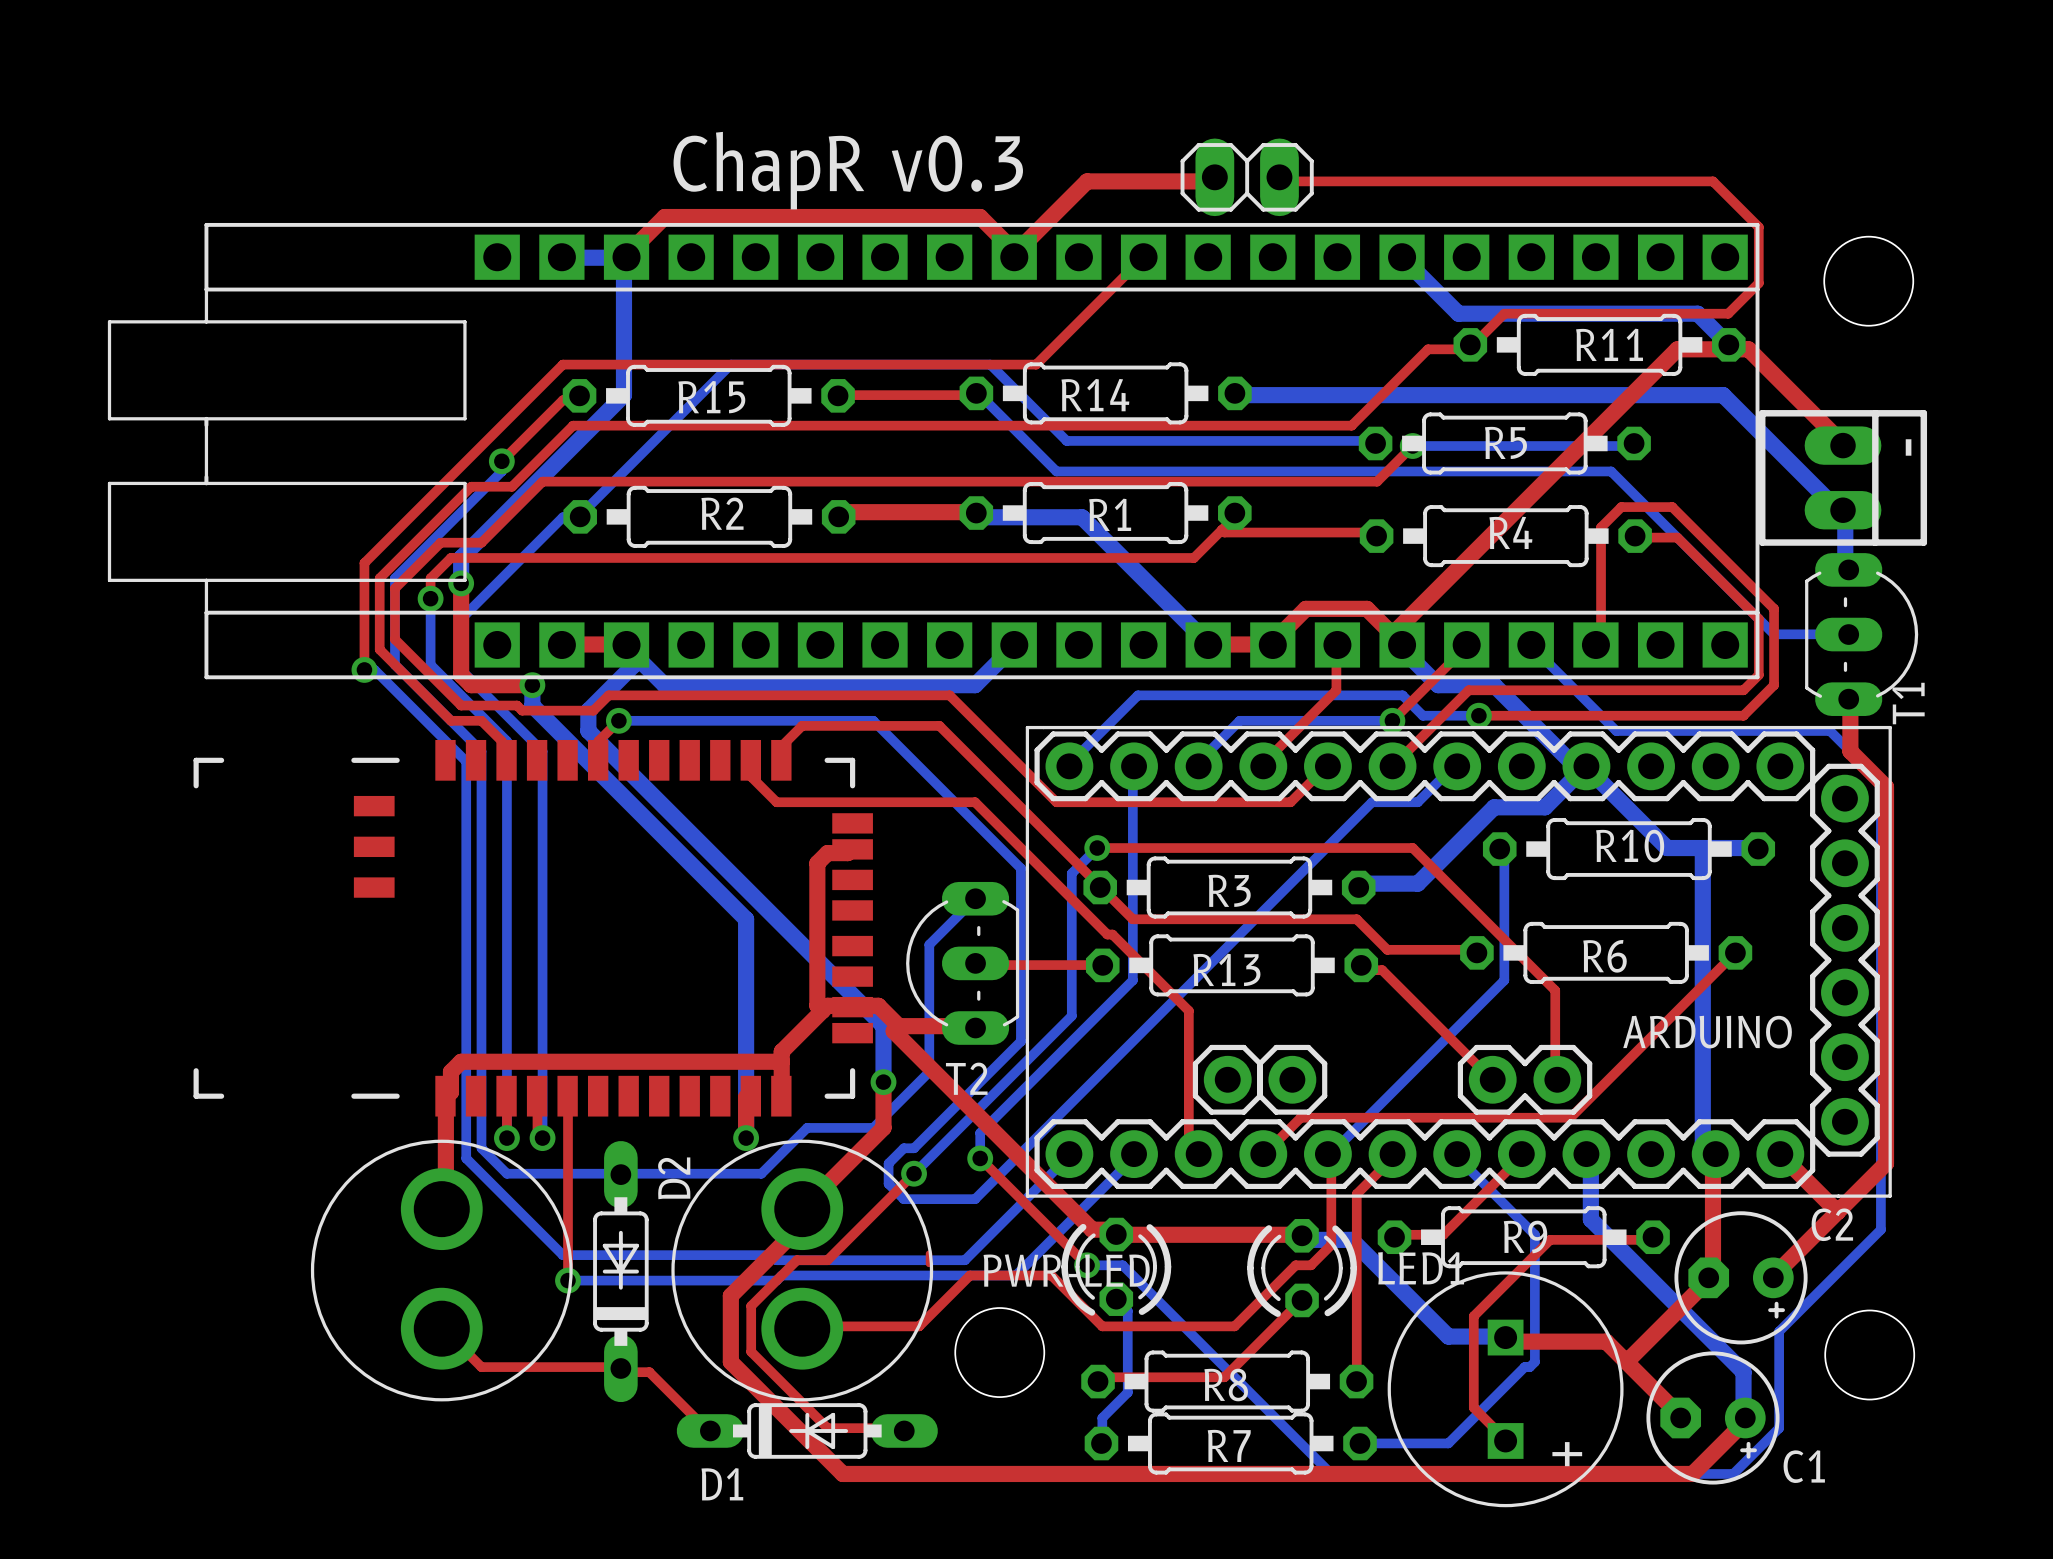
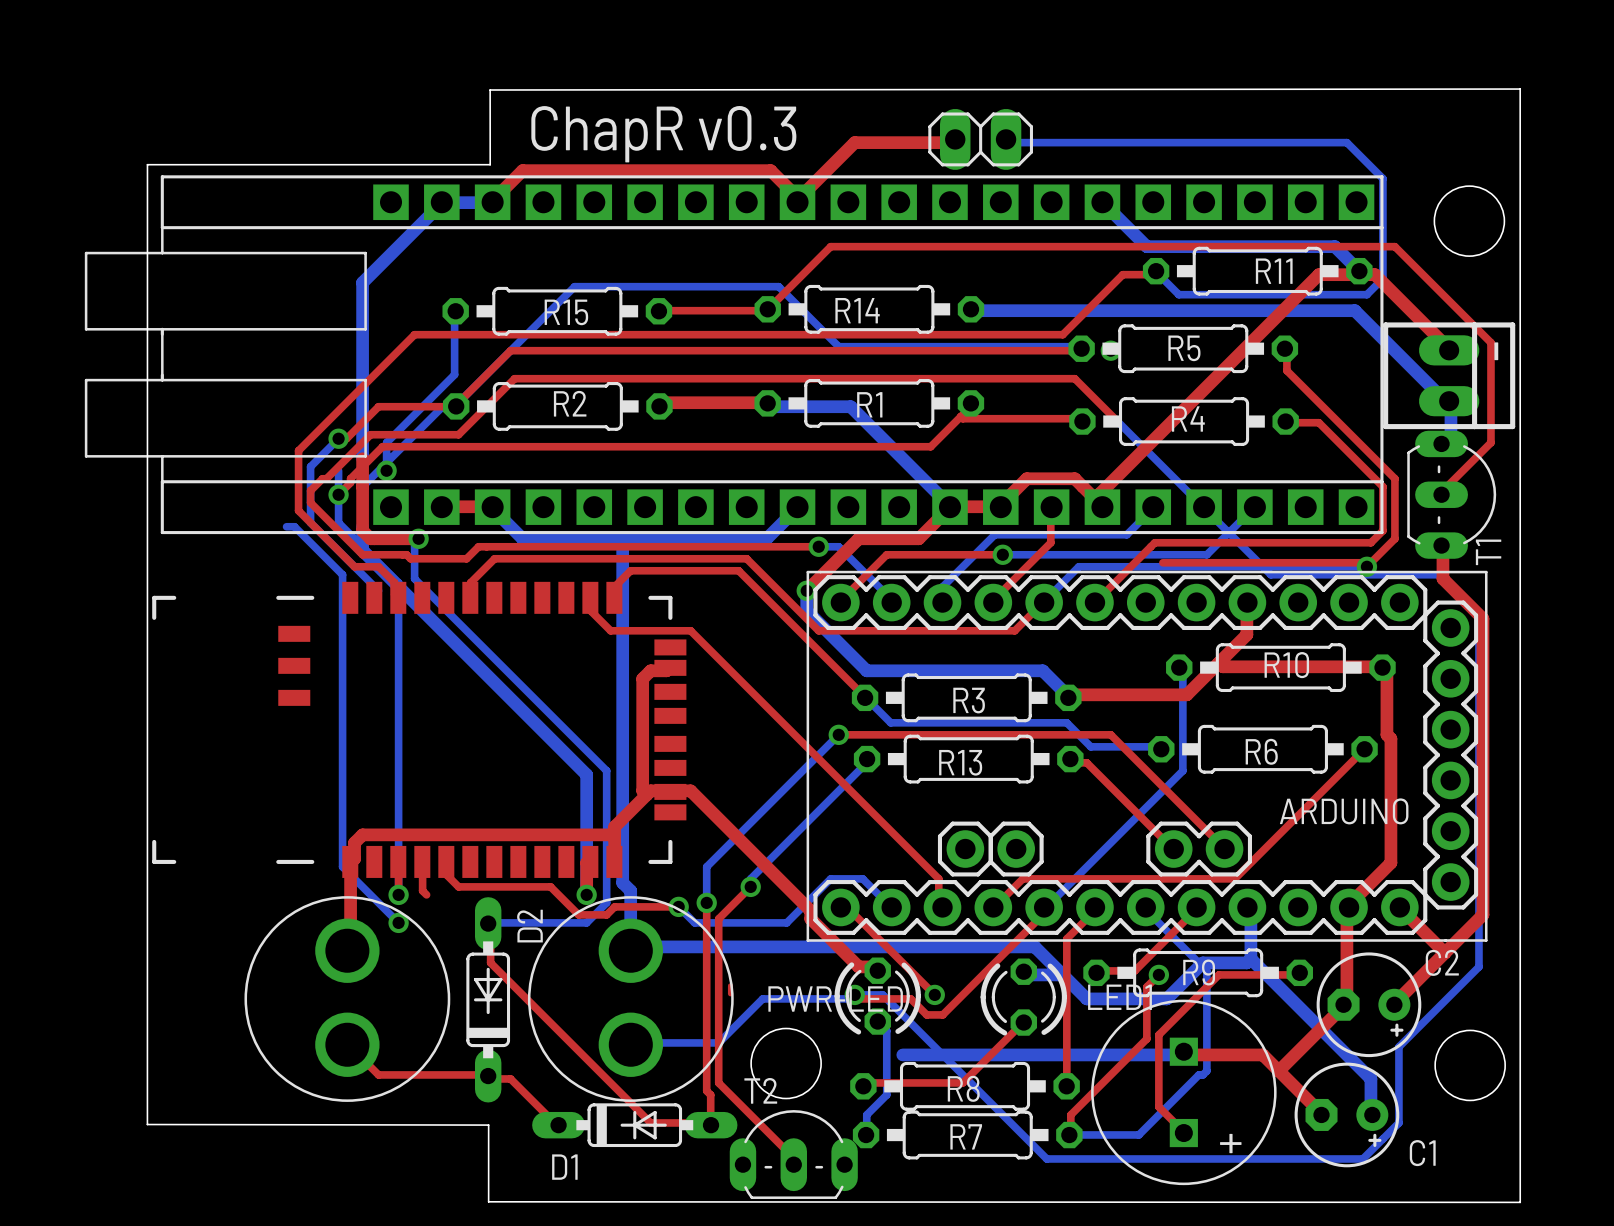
board edge: none -> (1520, 89) (1520, 1202) (488, 1201) (488, 1125) (147, 1124) (147, 164) (490, 164) (490, 90) (1520, 89)
top track: (1279, 177) (1280, 181) (1712, 181) (1758, 227) (1758, 283) (1728, 313) -> (1441, 494) (1442, 490) (1490, 442) (1490, 342) (1394, 246) (1358, 246)
bottom track: none -> (1006, 139) (1006, 142) (1346, 142) (1382, 178) (1382, 278) (1366, 294) (1178, 294) (1156, 271)
bottom track: (623, 257) (623, 395) (461, 557) -> (442, 202) (362, 282) (362, 438)
top track: (1143, 257) (1036, 364) (562, 364) (364, 563) (364, 669) -> none
top track: (1504, 313) (1473, 344) (1470, 344) -> (1182, 246) (830, 246) (767, 309)
bottom track: (976, 393) (1056, 471) (1611, 471) (1774, 634) (1848, 634) -> none
top track: (579, 395) (578, 400) (562, 400) (501, 461) -> none
bottom track: none -> (455, 311) (454, 374) (386, 442) (386, 470)
top track: (573, 425) (512, 486) (471, 486) (379, 578) -> (450, 334) (414, 334) (298, 450) (298, 454)
top track: none -> (1081, 348) (1078, 350) (510, 350) (456, 406) (378, 406) (346, 438) (338, 438)
bottom track: (1634, 443) (1631, 446) (1412, 446) -> none
top track: (1412, 446) (1377, 481) (1366, 481) -> (1114, 418) (1074, 378)
bottom track: (501, 461) (501, 471) (394, 578) (394, 593) -> (338, 438) (310, 466)
via: (501, 461) -> none
top track: (654, 481) (542, 481) (481, 542) (440, 542) (394, 588) (394, 624) -> (514, 378) (458, 434) (370, 434) (326, 478) (322, 478) (310, 490)
top track: (1672, 507) (1621, 507) (1601, 527) (1601, 644) (1595, 644) -> (1314, 398) (1286, 370) (1286, 350) (1284, 348)
bottom track: none -> (1114, 418) (1204, 507)
via: none -> (338, 438)
top track: (1193, 557) (450, 557) (430, 578) (430, 598) -> (938, 438) (930, 446) (382, 446) (350, 478) (350, 482) (338, 494)
via: (461, 583) -> none
via: (430, 598) -> none
via: none -> (386, 470)
via: none -> (338, 494)
T1 position: (1861, 634) -> (1451, 494)
bottom track: (626, 644) (634, 664) (588, 710) (588, 730) (883, 1026) (883, 1082) -> none
top track: none -> (949, 507) (918, 538) (858, 538) (806, 590)
bottom track: (1402, 644) (1402, 649) (1438, 685) (1494, 685) (1575, 766) (1586, 766) -> none
top track: (1466, 644) (1392, 720) -> none
bottom track: none -> (1254, 507) (1206, 554) (1002, 554)
via: (364, 669) -> none
bottom track: (461, 669) (527, 736) -> (414, 538) (414, 578)
bottom track: (532, 685) (532, 705) (746, 919) (746, 985) -> (362, 526) (362, 550) (586, 774)
bottom track: none -> (622, 538) (622, 882) (630, 890) (630, 950) (634, 946) (1034, 946) (1062, 974)
top track: (949, 695) (1056, 802) -> (746, 546) (818, 546)
via: none -> (818, 546)
top track: (1848, 699) (1850, 700) (1850, 751) -> (1441, 545) (1442, 578) (1454, 590)
top track: none -> (1002, 554) (886, 554) (840, 602)
via: none -> (1002, 554)
bottom track: (1478, 715) (1422, 715) (1402, 695) (1137, 695) (1071, 761) (1069, 766) -> none
via: (1478, 715) -> none
top track: none -> (486, 566) (494, 558) (746, 558) (818, 630) (830, 630)
bottom track: (618, 720) (873, 720) (1020, 868) (1020, 1041) (914, 1148) (903, 1148) (888, 1163) (888, 1183) (903, 1199) (975, 1199) (1000, 1173) -> (678, 906) (694, 922) (786, 922)
via: (618, 720) -> none
bottom track: (1372, 720) (1239, 720) (1199, 761) -> (1153, 507) (1126, 534) (994, 534) (942, 586) (942, 598)
bottom track: none -> (1078, 566) (1044, 602)
bottom track: none -> (1094, 566) (1366, 566)
via: (1392, 720) -> none
via: none -> (1366, 566)
bottom track: (435, 730) (466, 761) (466, 1158) (562, 1255) (771, 1255) (776, 1260) (964, 1260) (1069, 1154) -> none
bottom track: (481, 751) (481, 1148) -> (342, 574) (342, 866) (378, 902)
bottom track: (542, 751) (542, 1138) -> (426, 590) (606, 770) (606, 902) (586, 922)
via: none -> (806, 590)
bottom track: (1134, 766) (1132, 980) (980, 1133) (980, 1158) -> (891, 602) (890, 598) (838, 546) (818, 546)
bottom track: (1457, 766) (1453, 766) (1417, 802) (1372, 802) (1056, 1117) -> (891, 907) (862, 878) (830, 878)
top track: none -> (1247, 602) (1246, 634) (1186, 694) (1070, 694) (1068, 697)
bottom track: (1586, 766) (1545, 807) (1494, 807) (1417, 883) (1361, 883) (1358, 887) -> (806, 590) (806, 610) (866, 670) (1042, 670) (1068, 697)
bottom track: (1586, 766) (1667, 848) (1758, 849) -> none
top track: (878, 802) (975, 802) (1107, 934) -> (838, 734) (870, 734)
top track: none -> (1218, 662) (1222, 666) (1378, 666) (1386, 670) (1386, 734) (1390, 738) (1390, 862) (1350, 902) (1349, 907)
top track: (1097, 848) (1412, 848) (1555, 990) (1555, 1077) -> (874, 734) (1110, 734) (1222, 846)
bottom track: (1097, 848) (1071, 873) (1071, 1015) (914, 1173) -> none
via: (1097, 848) -> none
bottom track: (1702, 848) (1702, 1143) (1715, 1154) -> none
top track: (1100, 887) (1132, 919) (1356, 919) (1387, 949) (1473, 949) (1476, 952) -> none
bottom track: none -> (865, 697) (890, 722) (1066, 722) (1090, 746) (1158, 746) (1161, 749)
bottom track: (975, 898) (929, 944) (929, 1071) -> (838, 734) (730, 842)
via: none -> (838, 734)
top track: (1112, 934) (1188, 1010) (1188, 1148) (1193, 1153) -> (690, 630) (938, 878) (938, 906)
T2 rotation: 0° (962, 963) -> 90° clockwise (793, 1154)
T2 position: (962, 963) -> (793, 1154)
top track: (975, 963) (980, 965) (1102, 965) -> none
bottom track: none -> (867, 759) (866, 762) (750, 878) (750, 886)
top track: (975, 1028) (975, 1026) (898, 1026) (893, 1031) (1031, 1168) -> (706, 806) (810, 910) (810, 918)
T2 name position: T2 (966, 1078) -> T2 (760, 1090)
top track: (883, 1082) (883, 1127) (802, 1209) -> none
via: (883, 1082) -> none
bottom track: (898, 1102) (873, 1127) (807, 1127) (761, 1173) (746, 1173) -> (706, 866) (706, 902)
top track: (568, 1112) (568, 1280) -> (446, 874) (458, 886) (550, 886) (578, 914) (606, 914) (614, 906) (678, 906)
top track: none -> (750, 886) (718, 918) (718, 1082) (790, 1154) (790, 1162) (793, 1164)
via: none -> (750, 886)
via position: (542, 1138) -> (398, 922)
top track: none -> (706, 902) (706, 1090) (710, 1094) (710, 1122)
via: none -> (706, 902)
via: none -> (678, 906)
top track: none -> (840, 907) (842, 910) (850, 910) (934, 994)
bottom track: (1134, 1154) (1132, 1158) (1015, 1275) (781, 1275) (776, 1280) (568, 1280) -> none
top track: (980, 1158) (1087, 1265) -> none
via: (980, 1158) -> none
top track: (1331, 1158) (1331, 1244) (1310, 1265) (1295, 1265) (1234, 1326) (1102, 1326) (1051, 1275) (970, 1275) (919, 1326) (807, 1326) (802, 1328) -> (1046, 910) (942, 1014) (926, 1014) (910, 998) (858, 998)
bottom track: (506, 1173) (620, 1174) -> none
top track: (914, 1173) (827, 1260) (797, 1260) (751, 1306) (751, 1351) -> (488, 923) (490, 926) (490, 962) (590, 1062)
via: (914, 1173) -> none
top track: (802, 1209) (802, 1224) (730, 1295) (730, 1362) (842, 1473) (1692, 1473) (1743, 1423) (1745, 1417) -> none
top track: (1116, 1234) (1302, 1235) -> none
top track: none -> (1158, 974) (1146, 986) (1146, 1038) (1070, 1114) (1069, 1135)
via: none -> (1158, 974)
via: none -> (934, 994)
bottom track: none -> (858, 998) (762, 998) (718, 1042) (634, 1042) (630, 1044)
bottom track: (1382, 1270) (1448, 1336) (1505, 1337) -> (1086, 998) (1166, 998) (1202, 962) (1246, 962) (1250, 958)
via: (568, 1280) -> none
bottom track: none -> (1183, 1051) (1182, 1054) (902, 1054)

